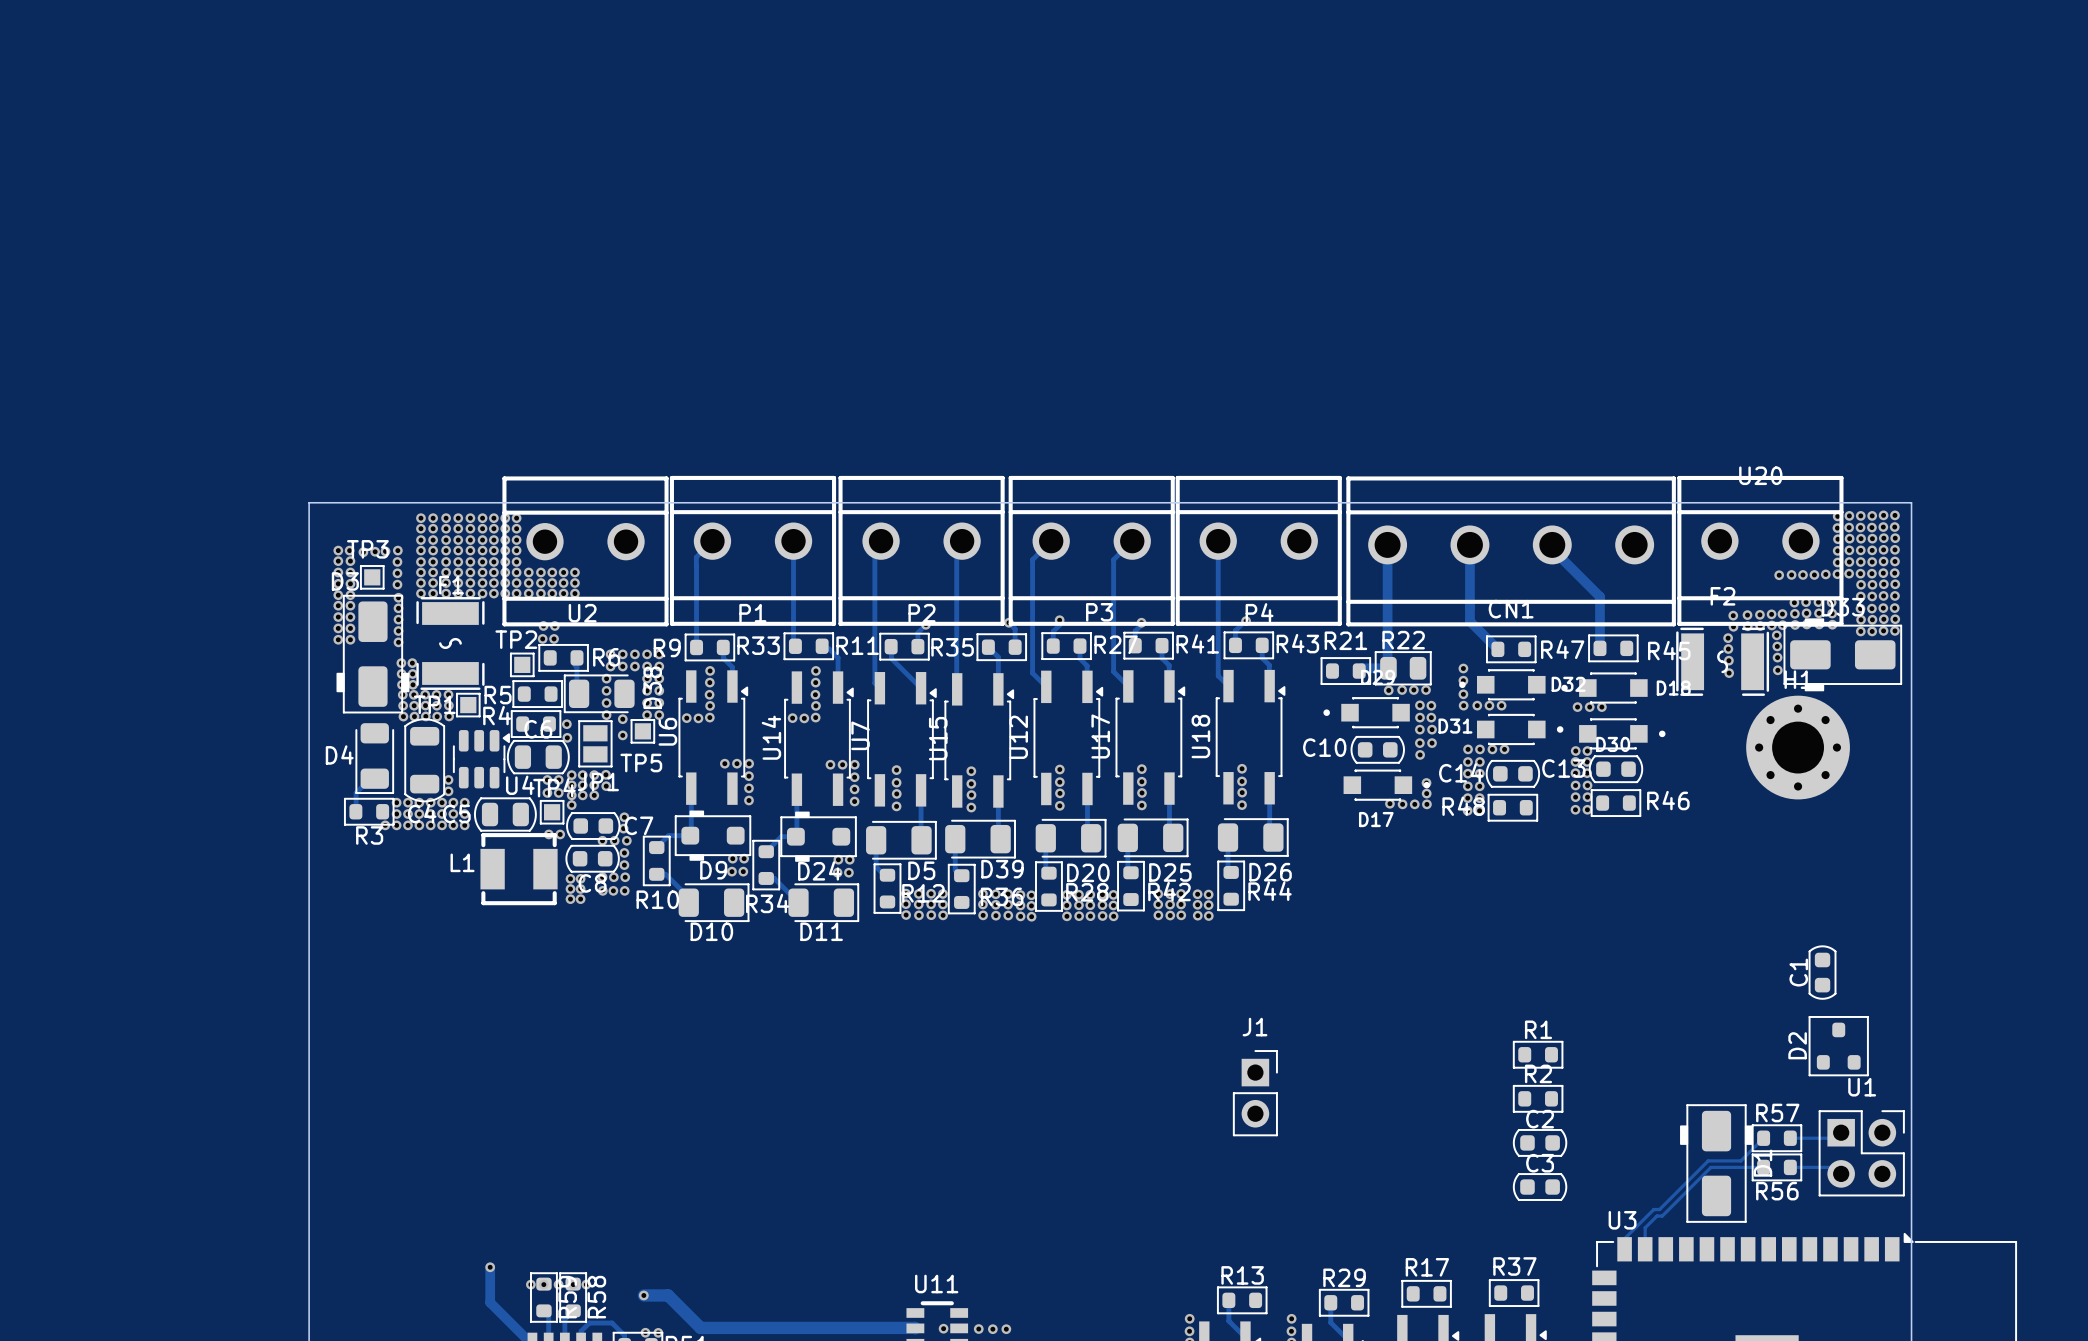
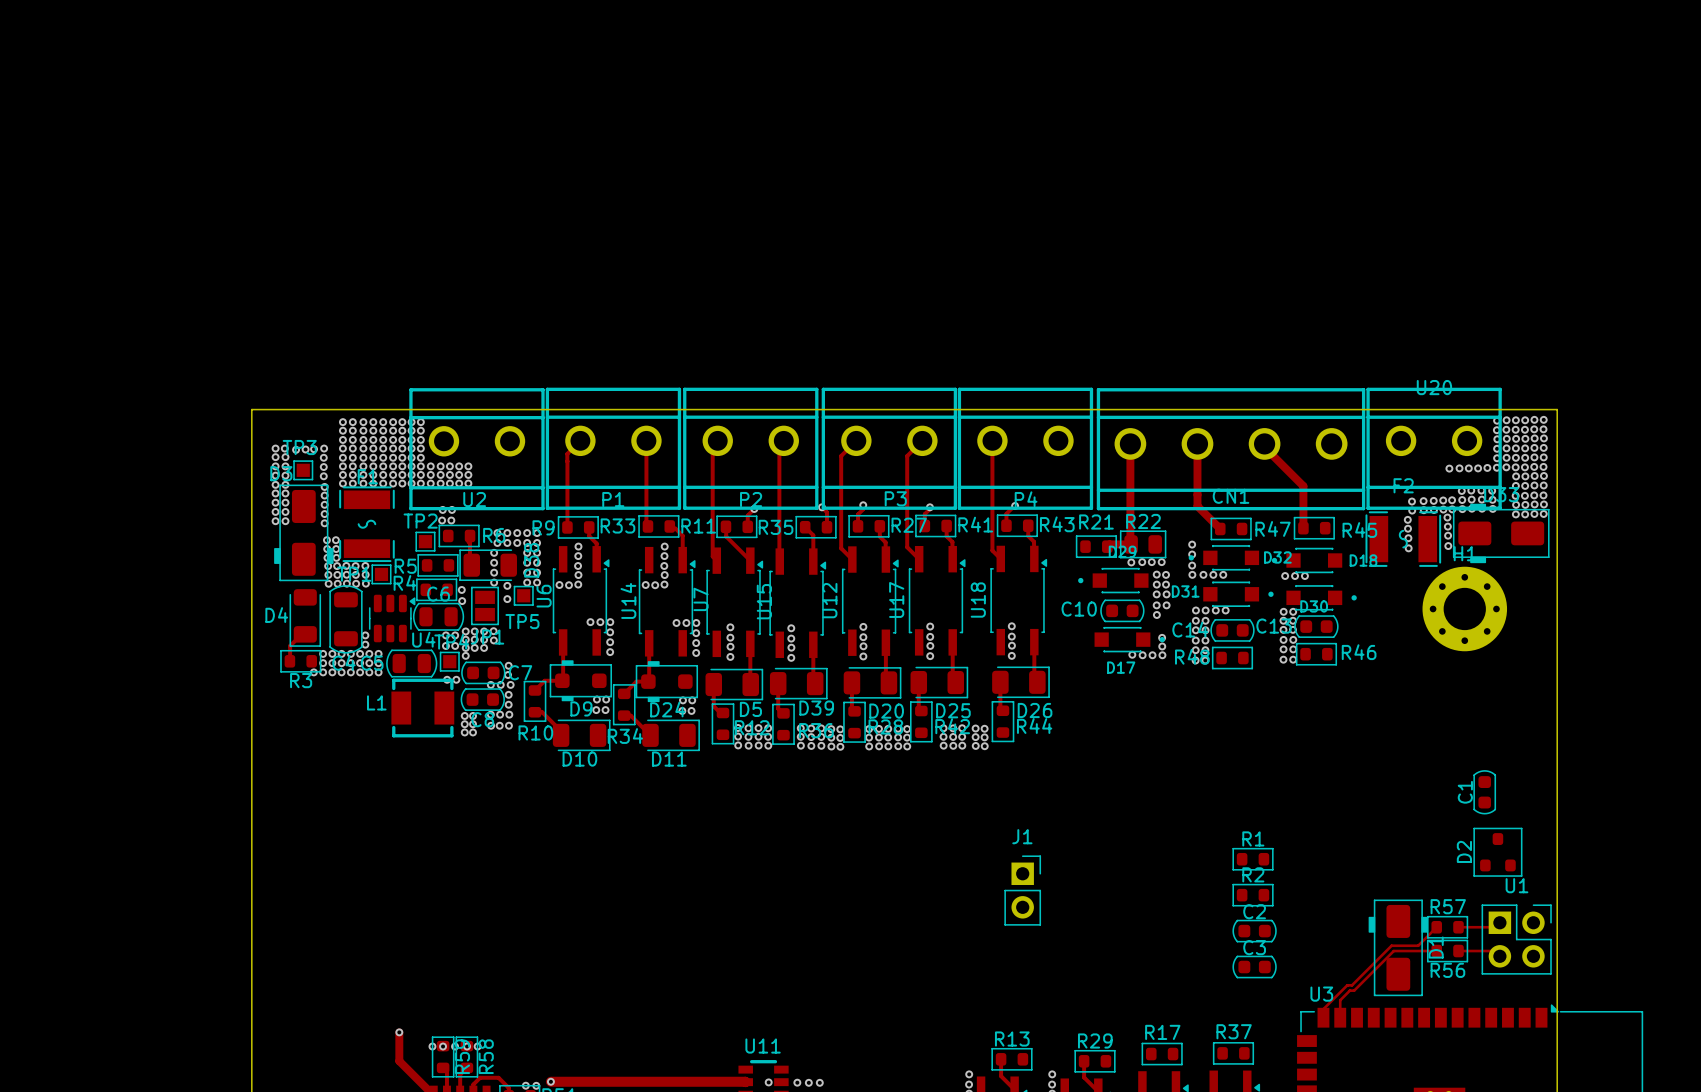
track: (643, 1295) (668, 1295) (700, 1327) -> (550, 1081) (570, 1081)
via position: (643, 1295) -> (550, 1081)

